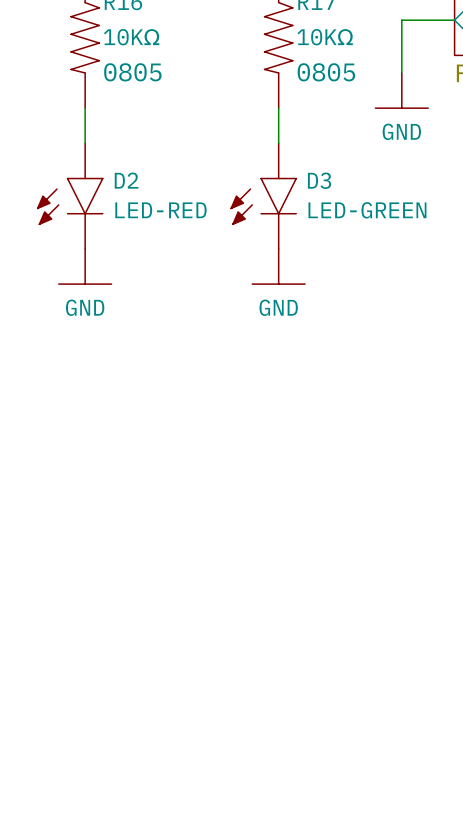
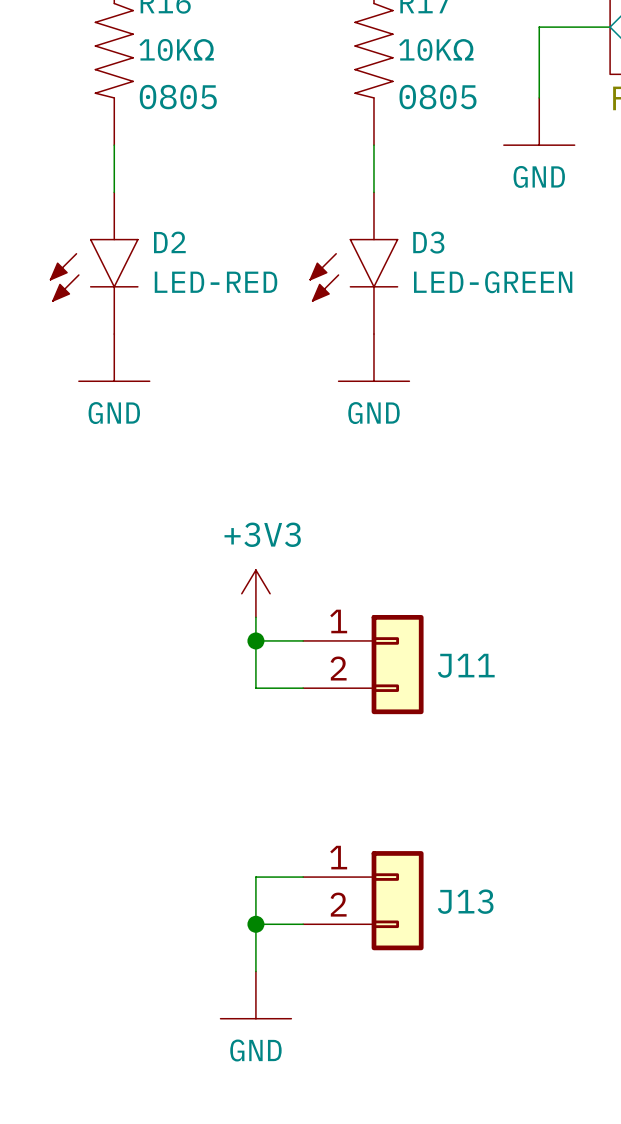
power symbol: none -> +3V3 (255, 593)
wire: none -> (255, 617) (255, 688) (303, 688)
wire: none -> (255, 640) (303, 640)
junction: none -> (255, 640)
J11: none -> (363, 664)
wire: none -> (303, 877) (255, 877) (255, 971)
J13: none -> (363, 900)
wire: none -> (255, 924) (303, 924)
junction: none -> (255, 924)
power symbol: none -> GND (255, 995)

